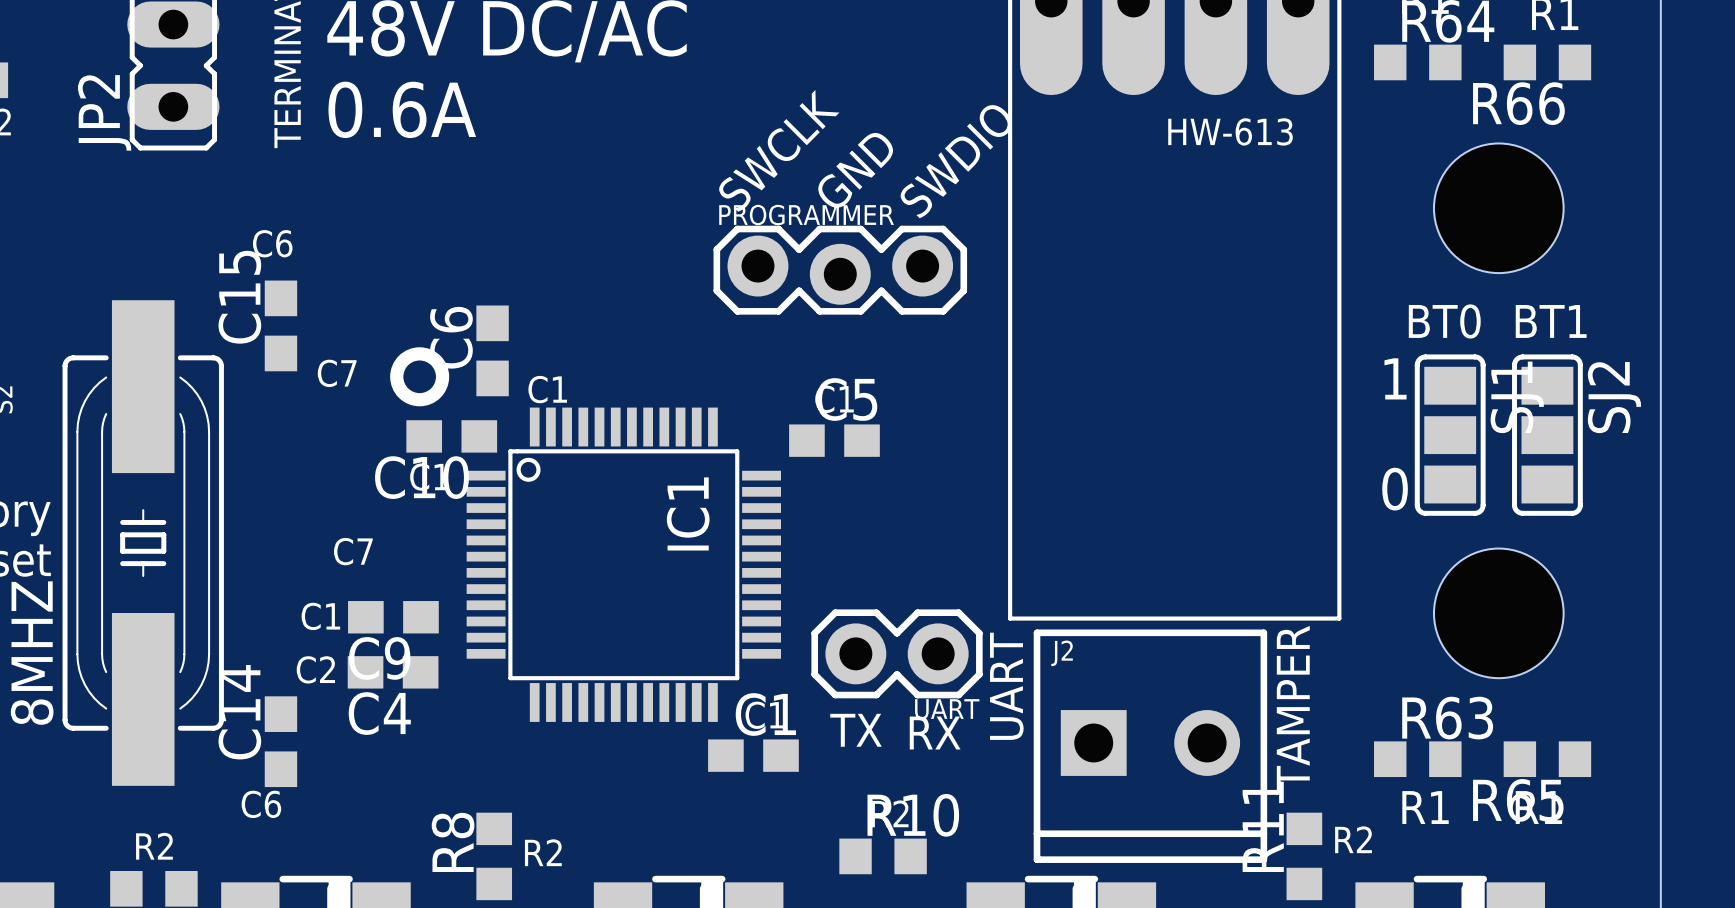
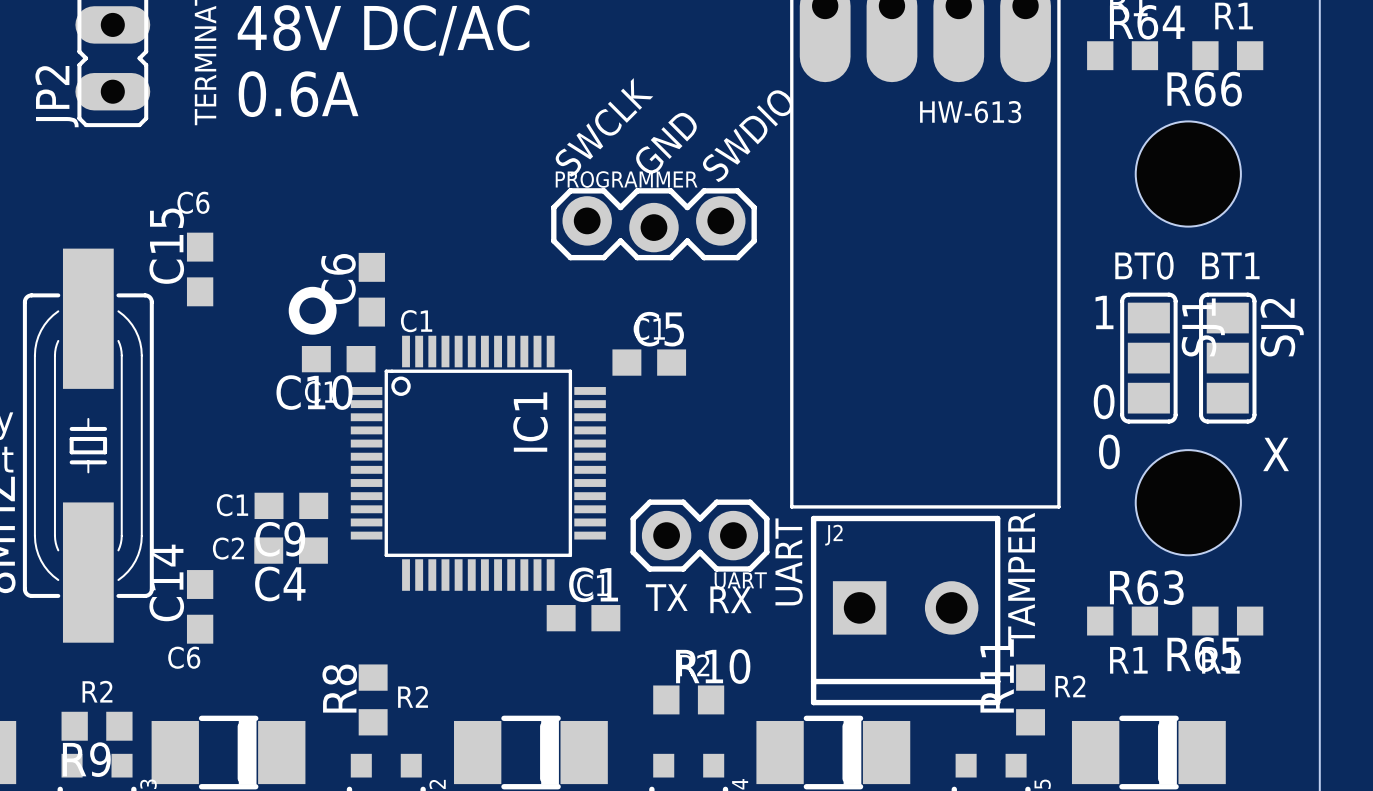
text: C7 (337, 373) -> none
text: none -> 0 (1109, 451)
text: C7 (353, 551) -> none
text: none -> X (1276, 454)

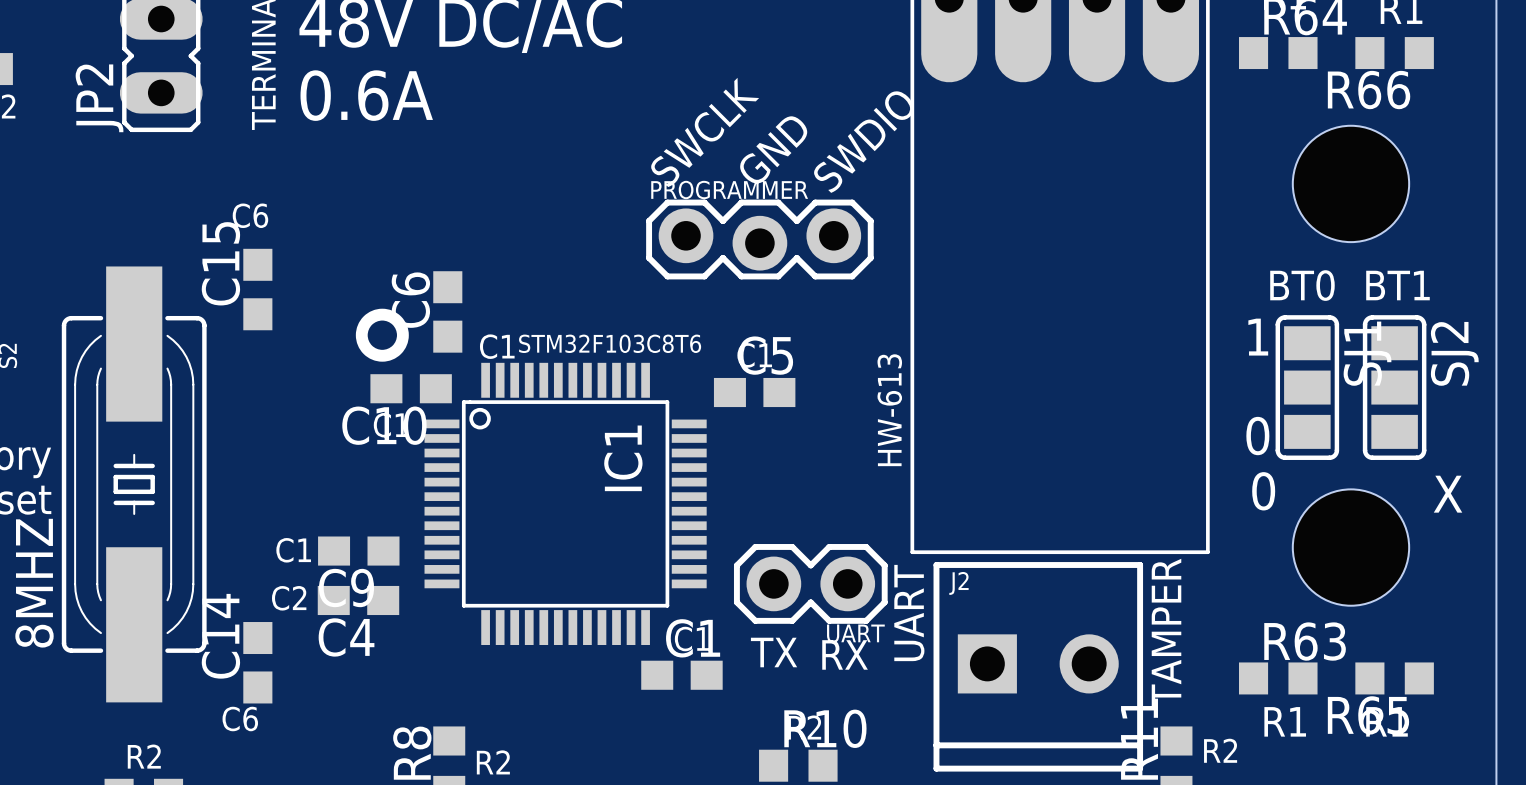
text rotation: 0° (970, 112) -> 90° counterclockwise (889, 410)
text position: HW-613 (970, 112) -> HW-613 (889, 410)
text: none -> STM32F103C8T6 (610, 343)

